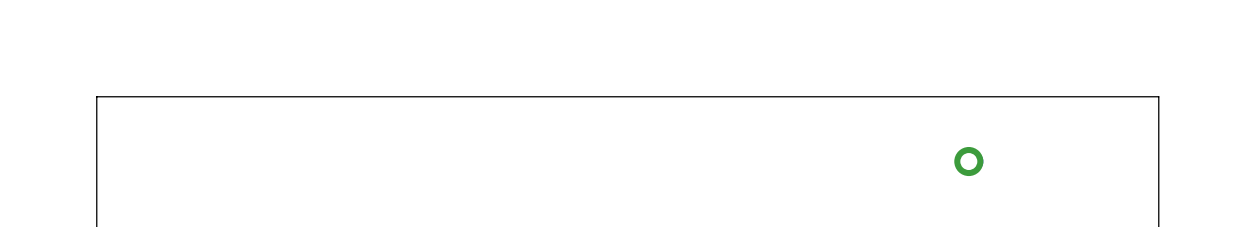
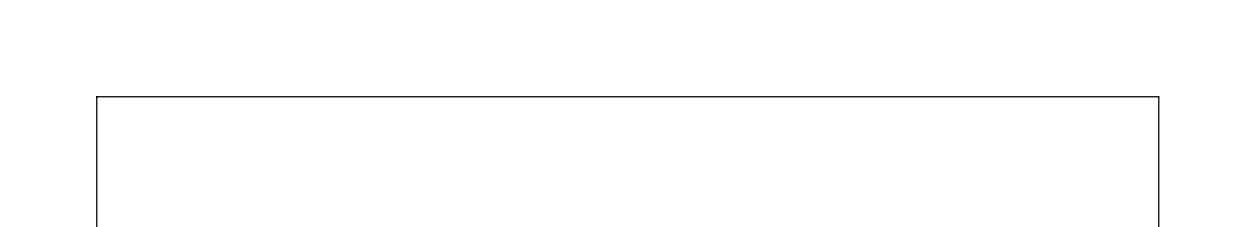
via: (968, 161) -> none

